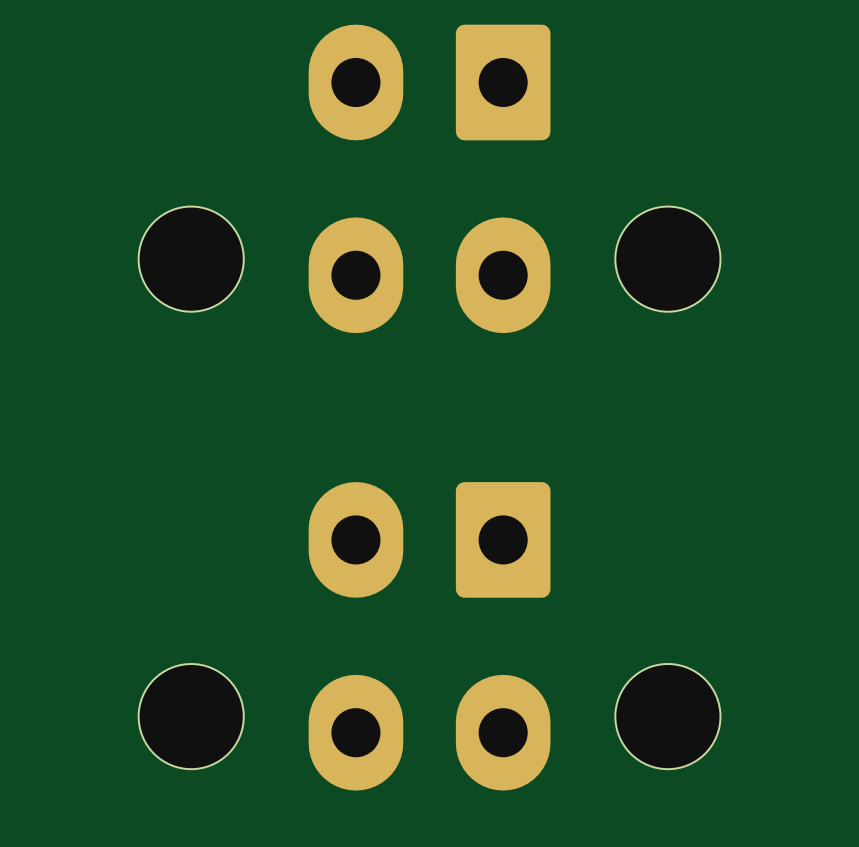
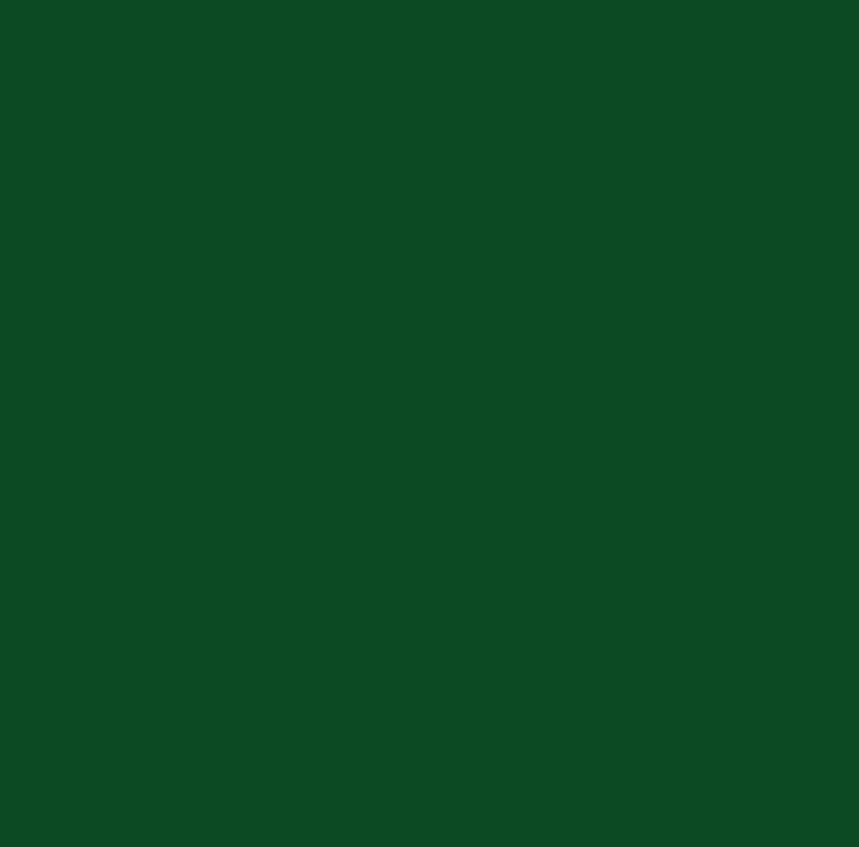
part: (429, 178) -> none
part: (429, 636) -> none

